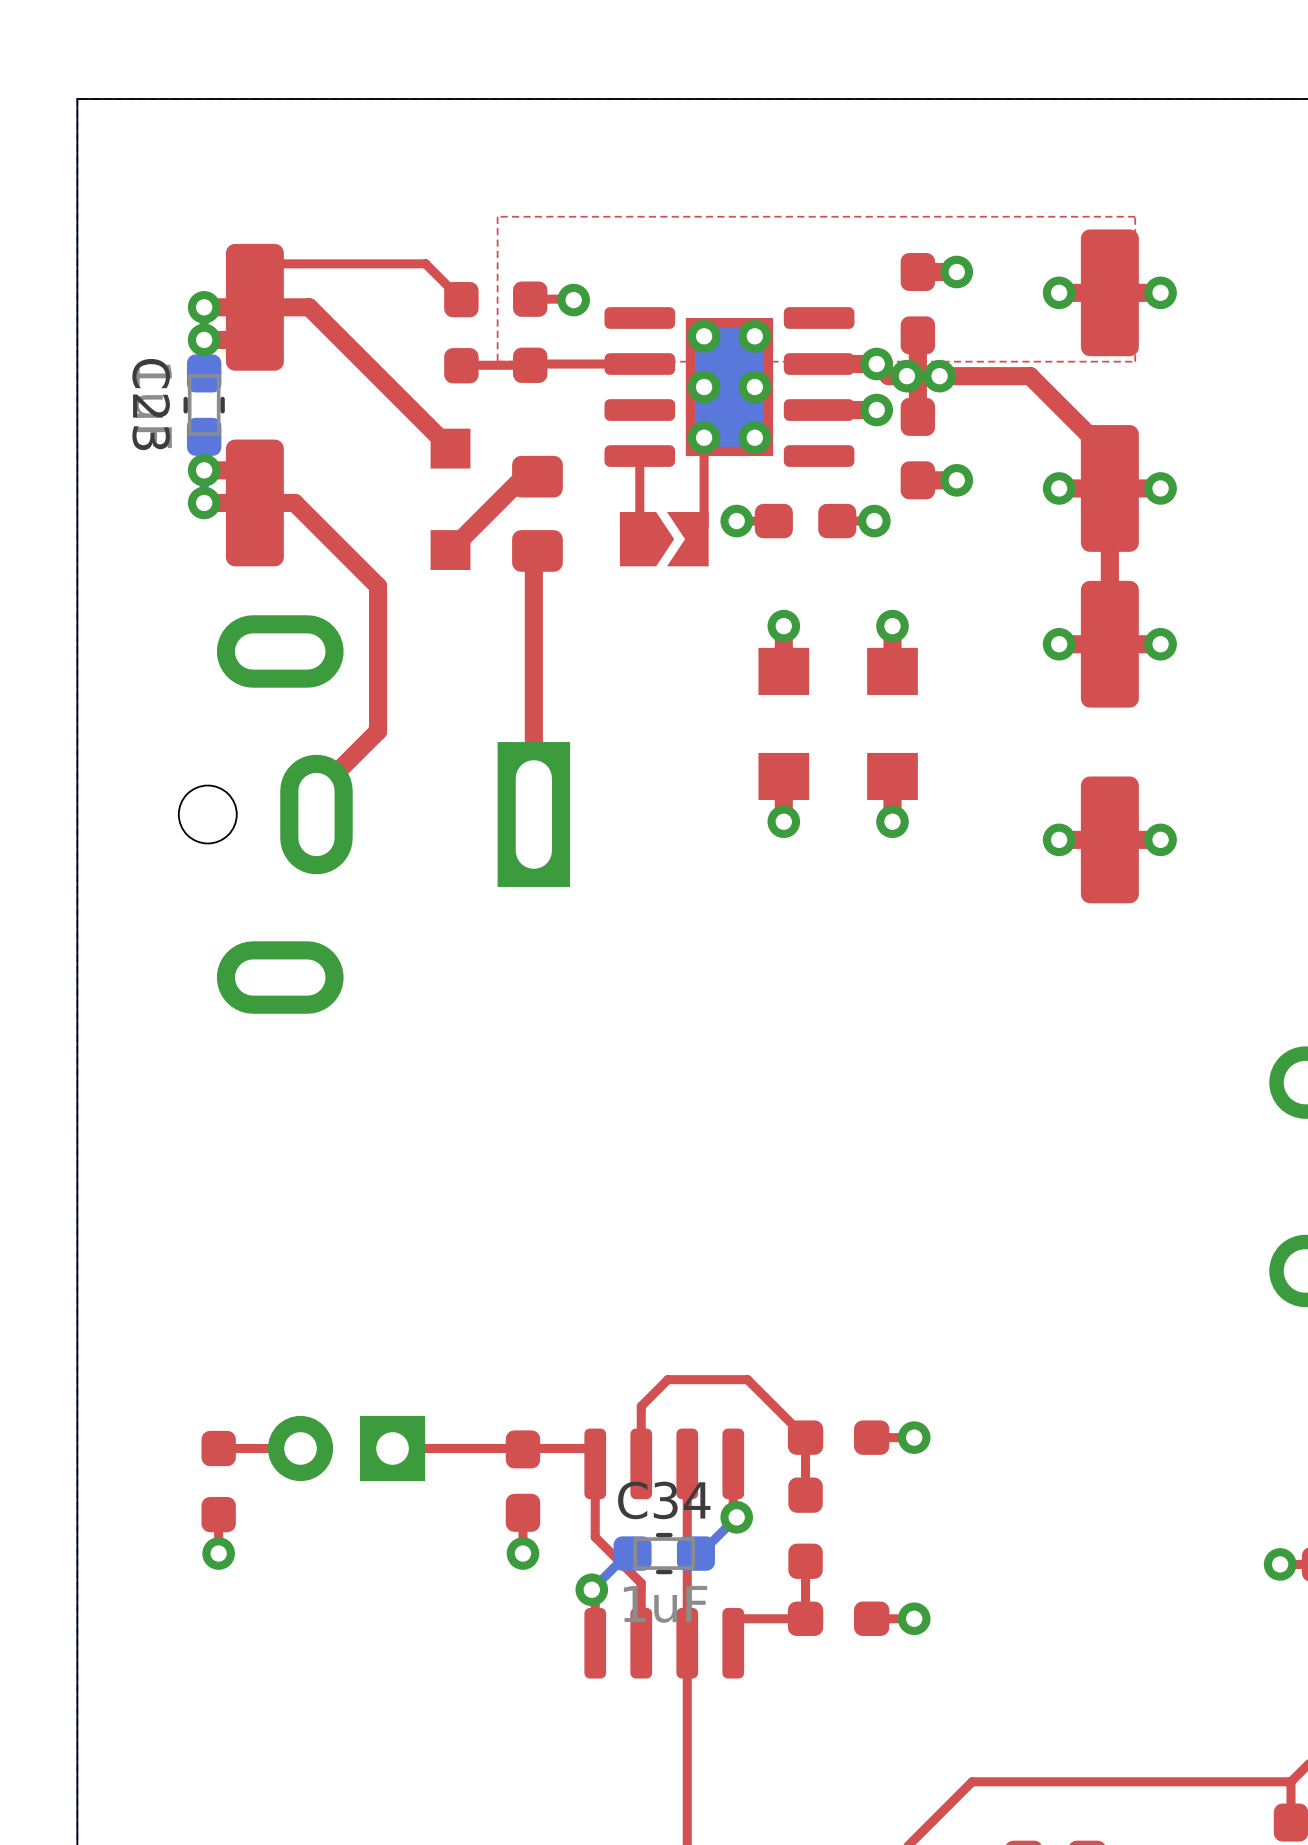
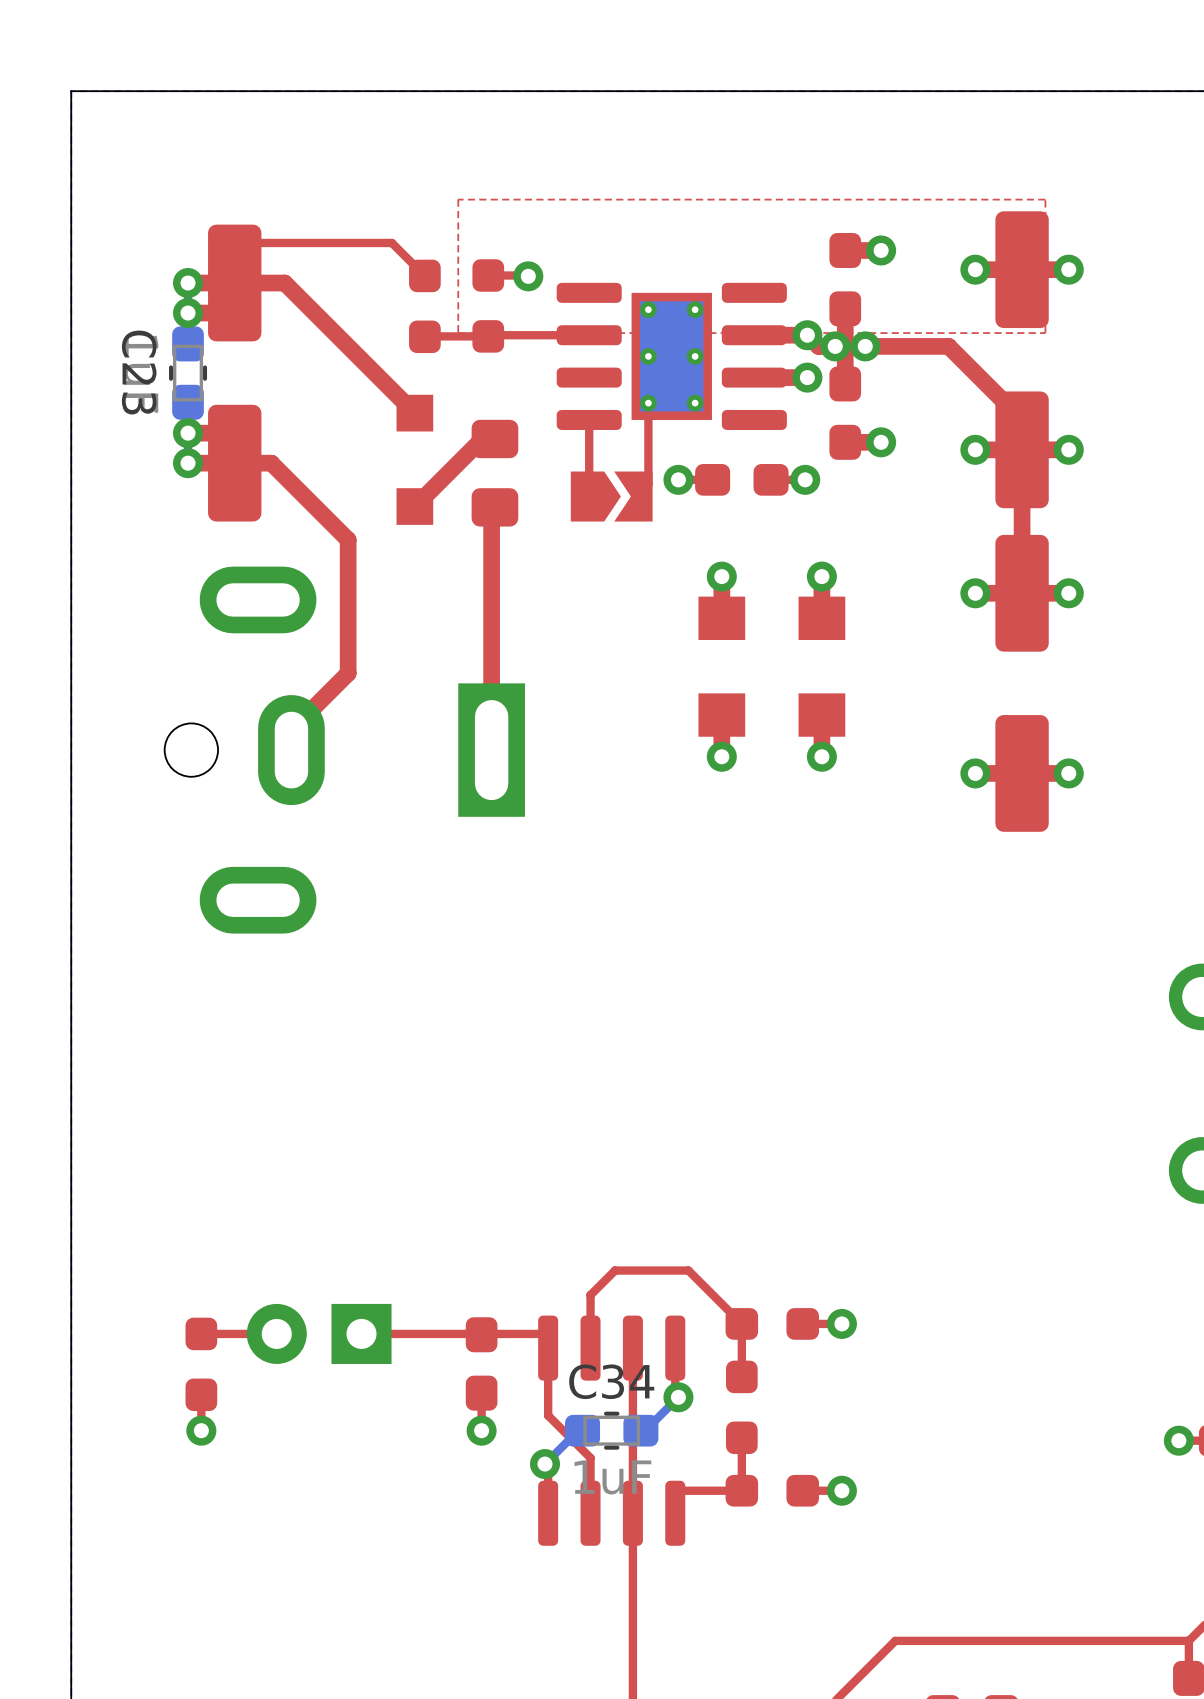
part footprint: [604, 307, 855, 467] -> [556, 282, 787, 430]

